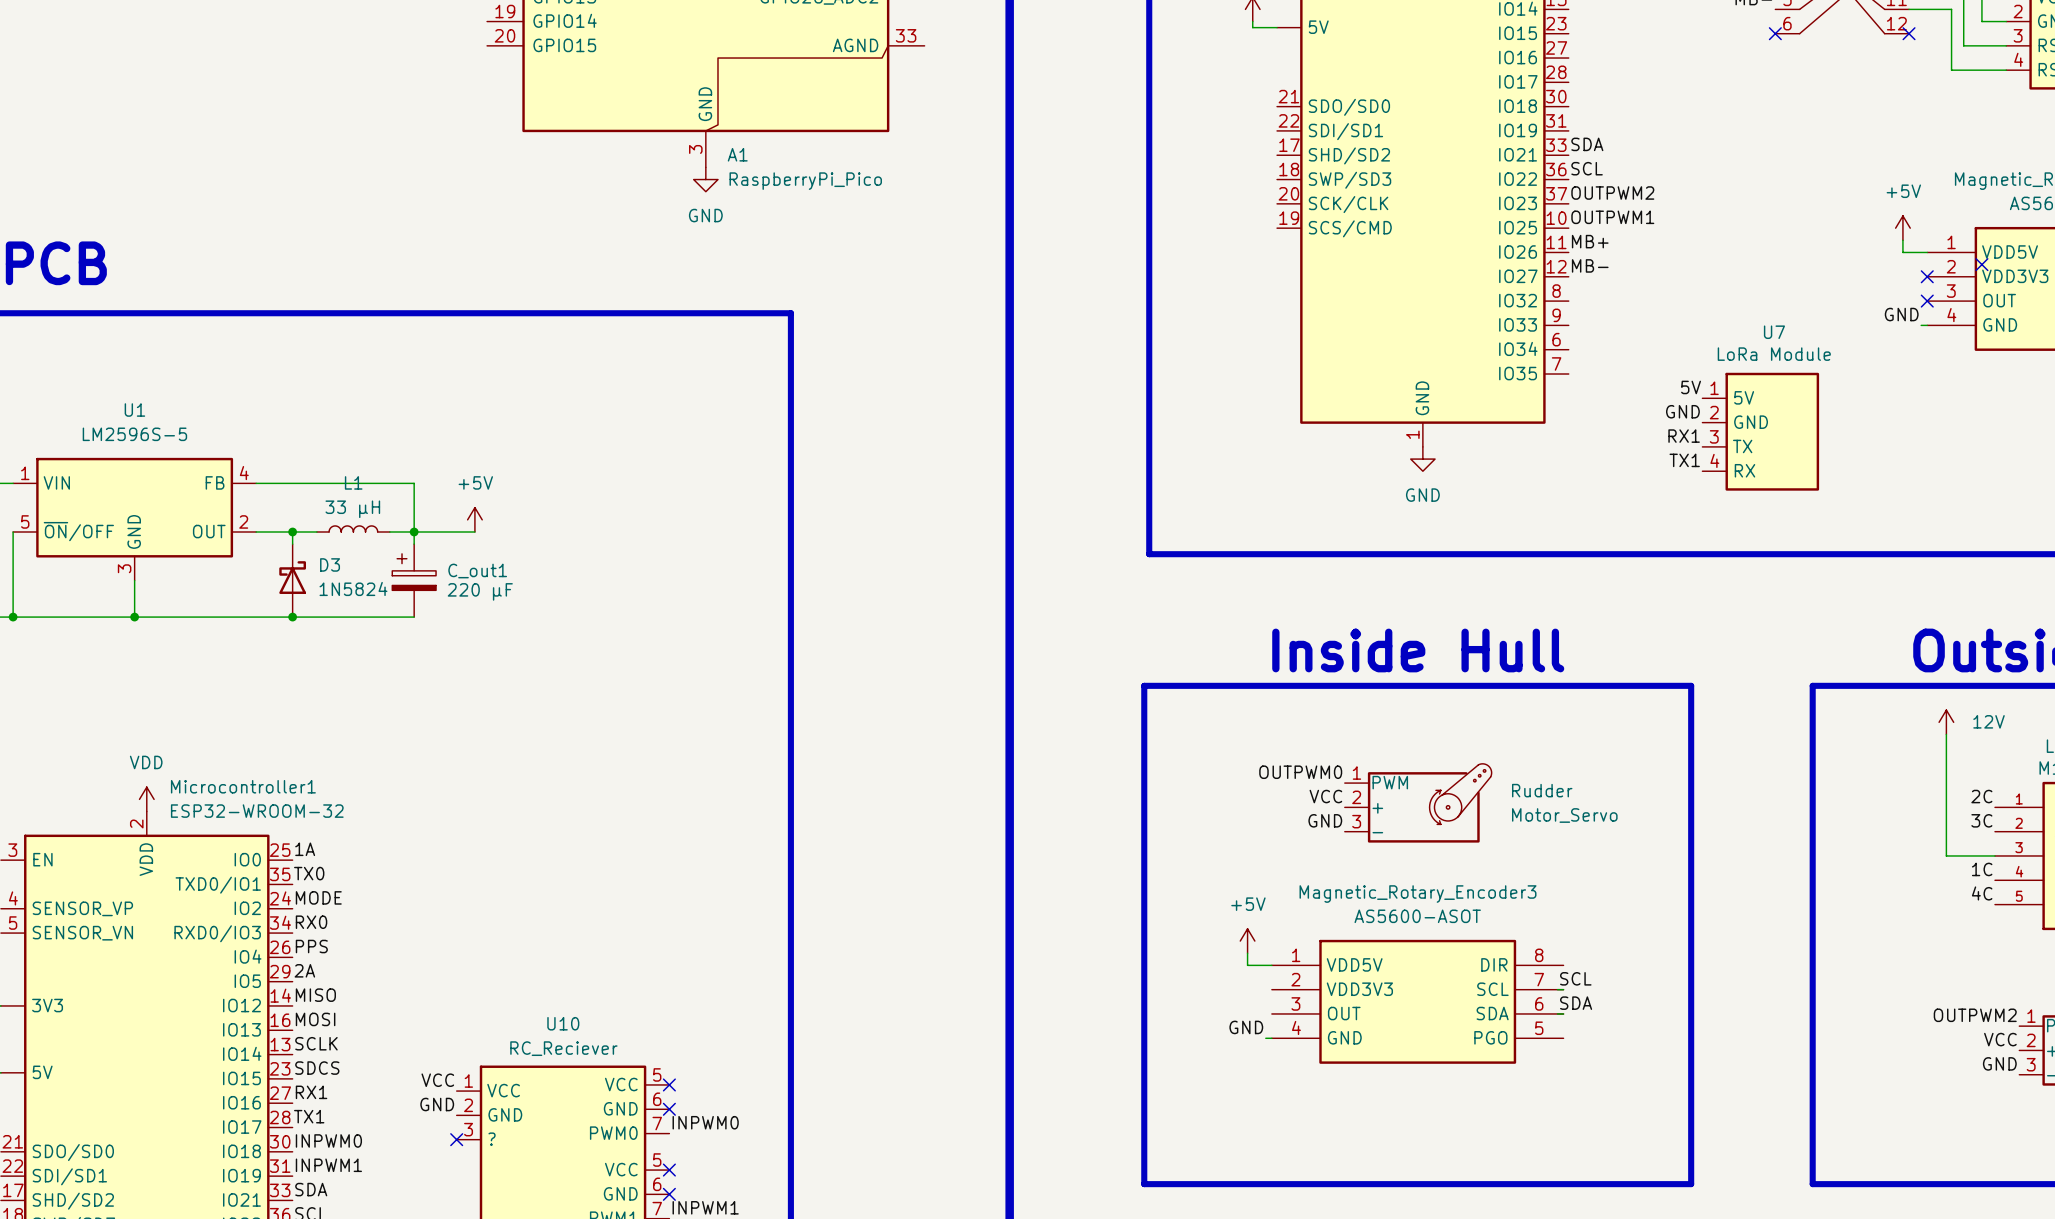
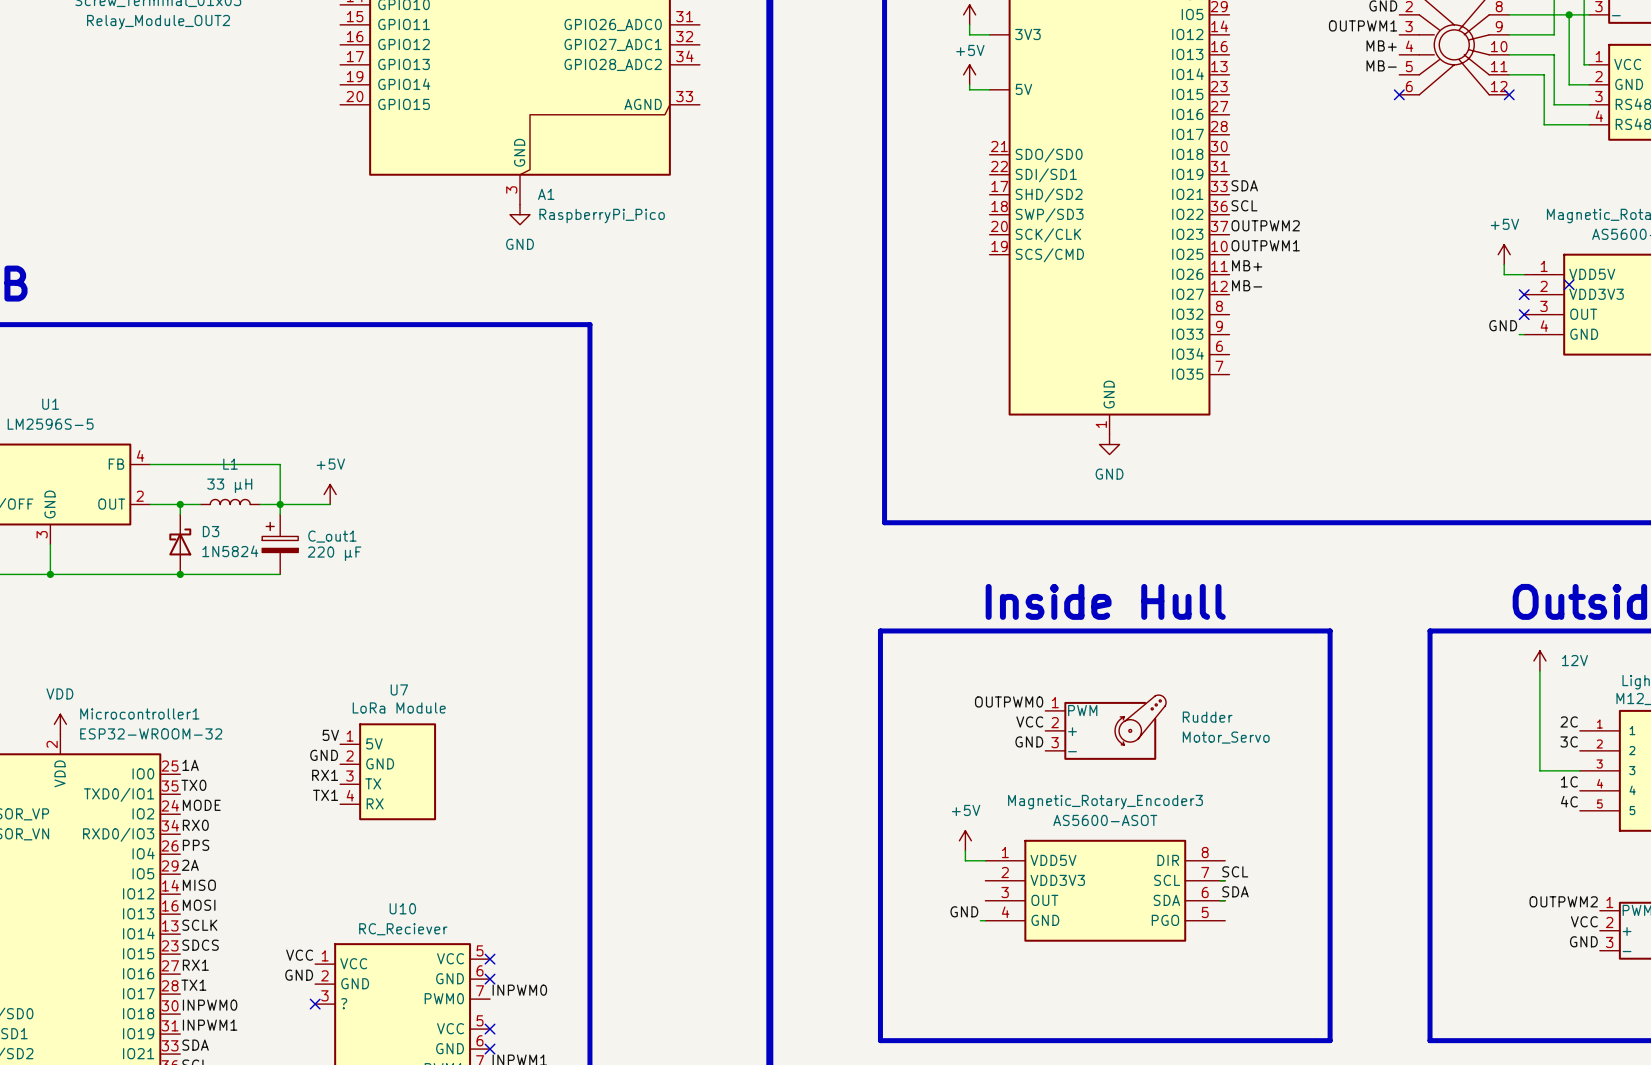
label: 5V (1691, 387) -> none
label: GND (1682, 411) -> none
U7 position: (1760, 431) -> (388, 771)
label: RX1 (1684, 436) -> none
label: TX1 (1684, 460) -> none
label: none -> 5V (330, 735)
label: none -> GND (324, 755)
label: none -> RX1 (325, 775)
label: none -> TX1 (325, 795)

